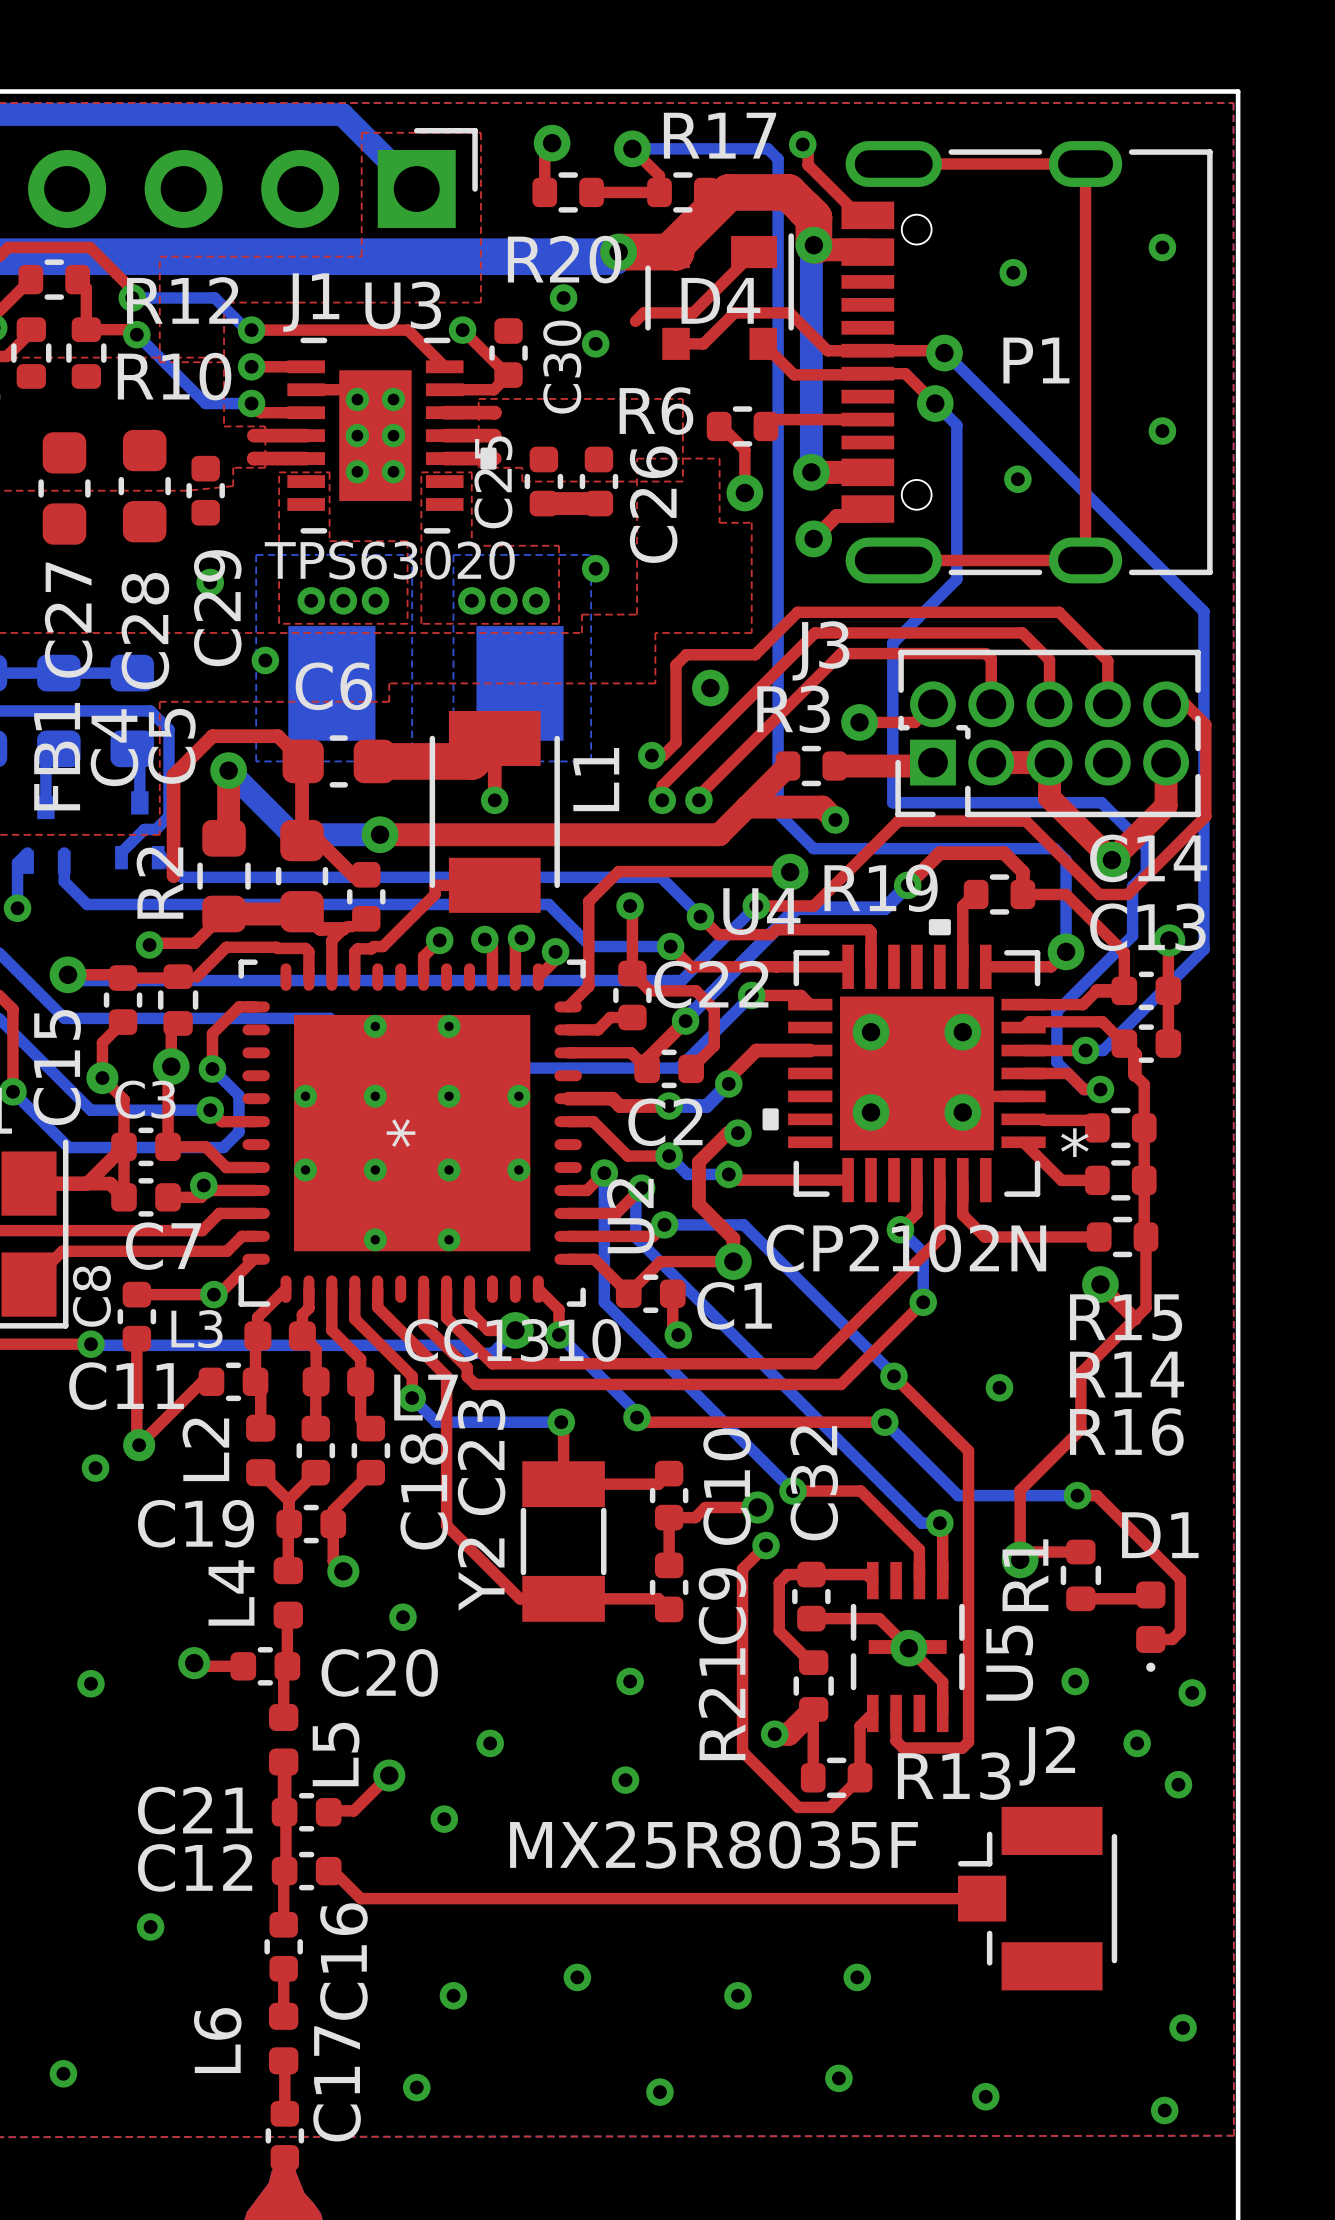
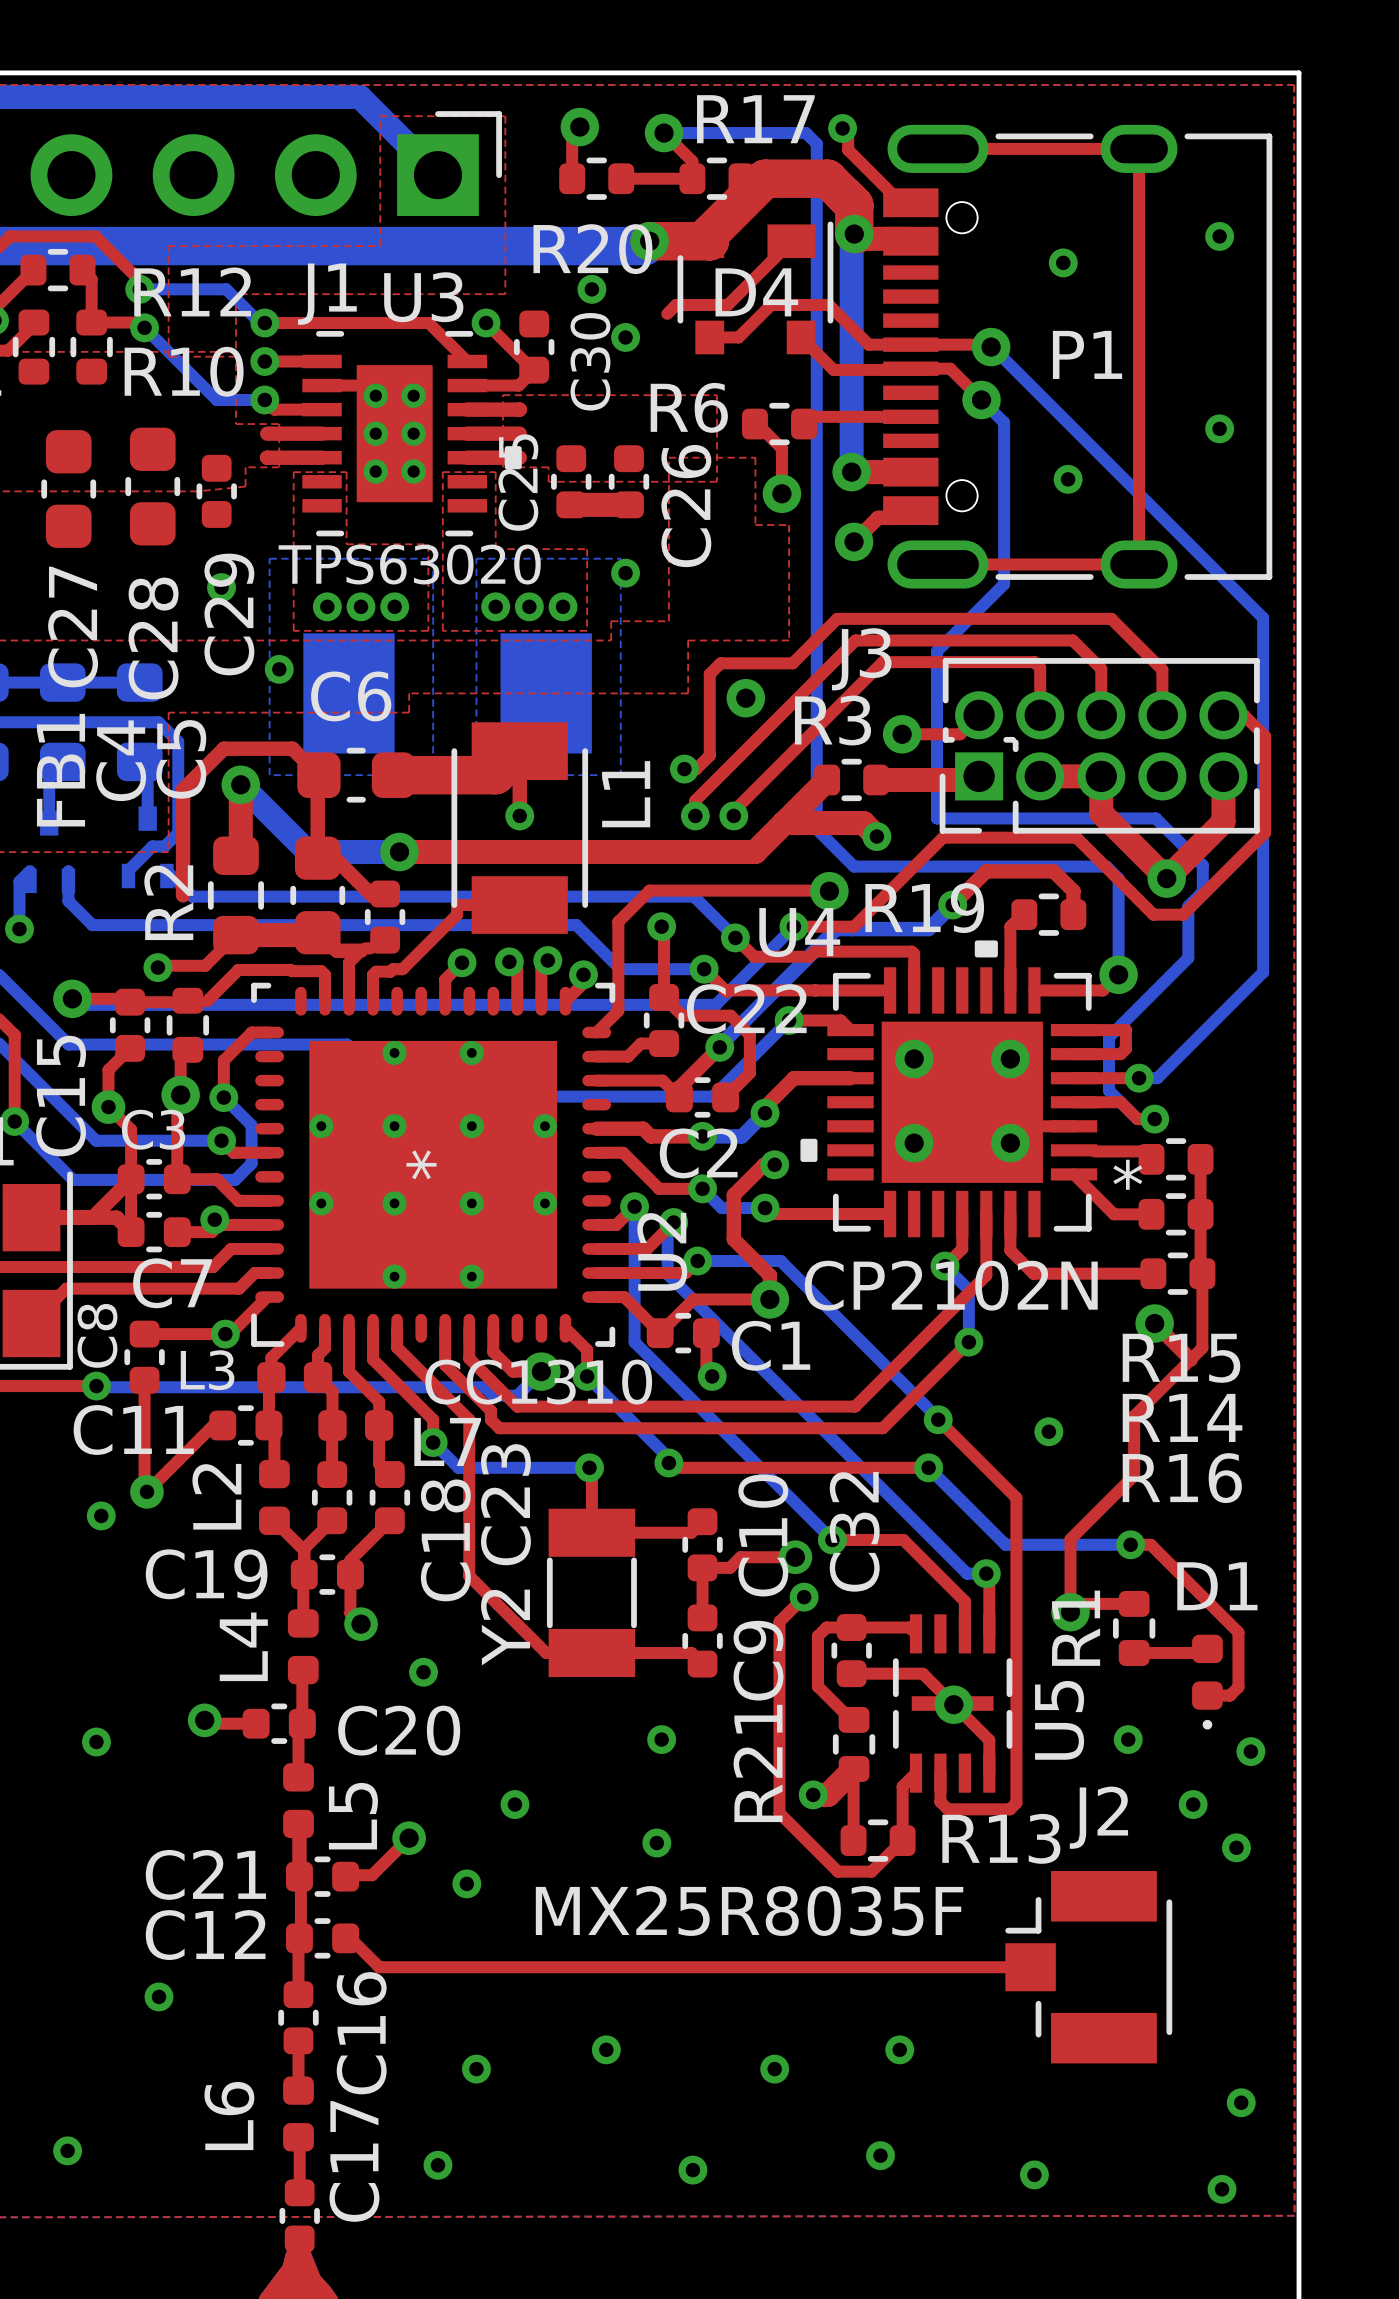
top track: (1022, 894) (1066, 894) (1124, 952) (1124, 990) (1096, 990) (1083, 1004) (1072, 1004) -> (1074, 1054) (1120, 1054) (1125, 1048) (1125, 1030)
top track: (1169, 940) (1168, 1043) -> none
via: (1169, 940) -> none
C14: (1146, 990) -> none
top track: (1023, 1027) (1029, 1021) (1102, 1021) (1134, 1054) (1134, 1075) (1144, 1084) (1144, 1127) -> none
C13: (1146, 1043) -> none

